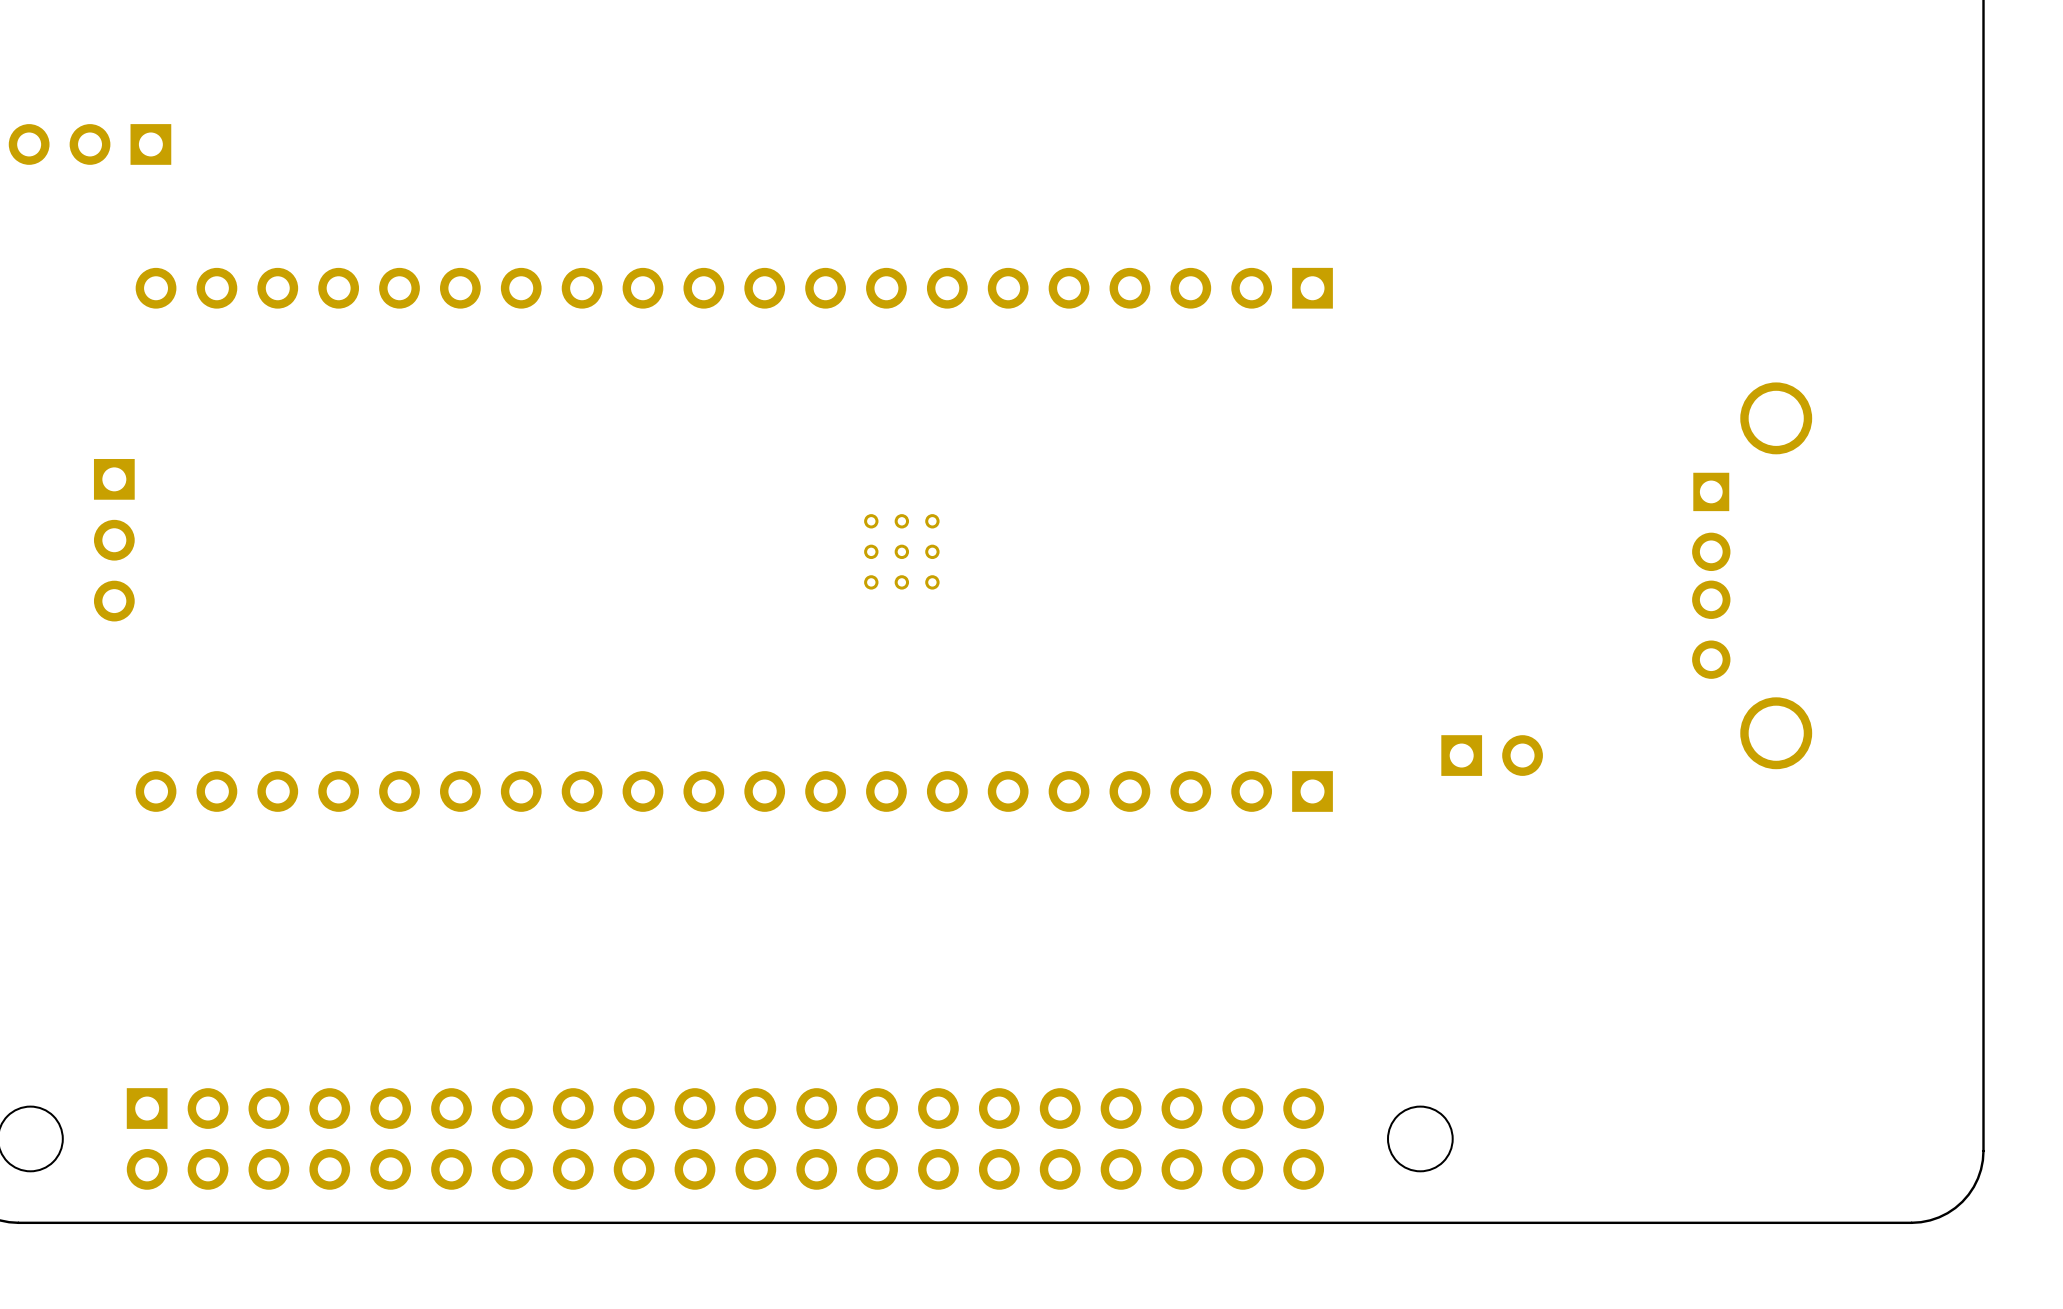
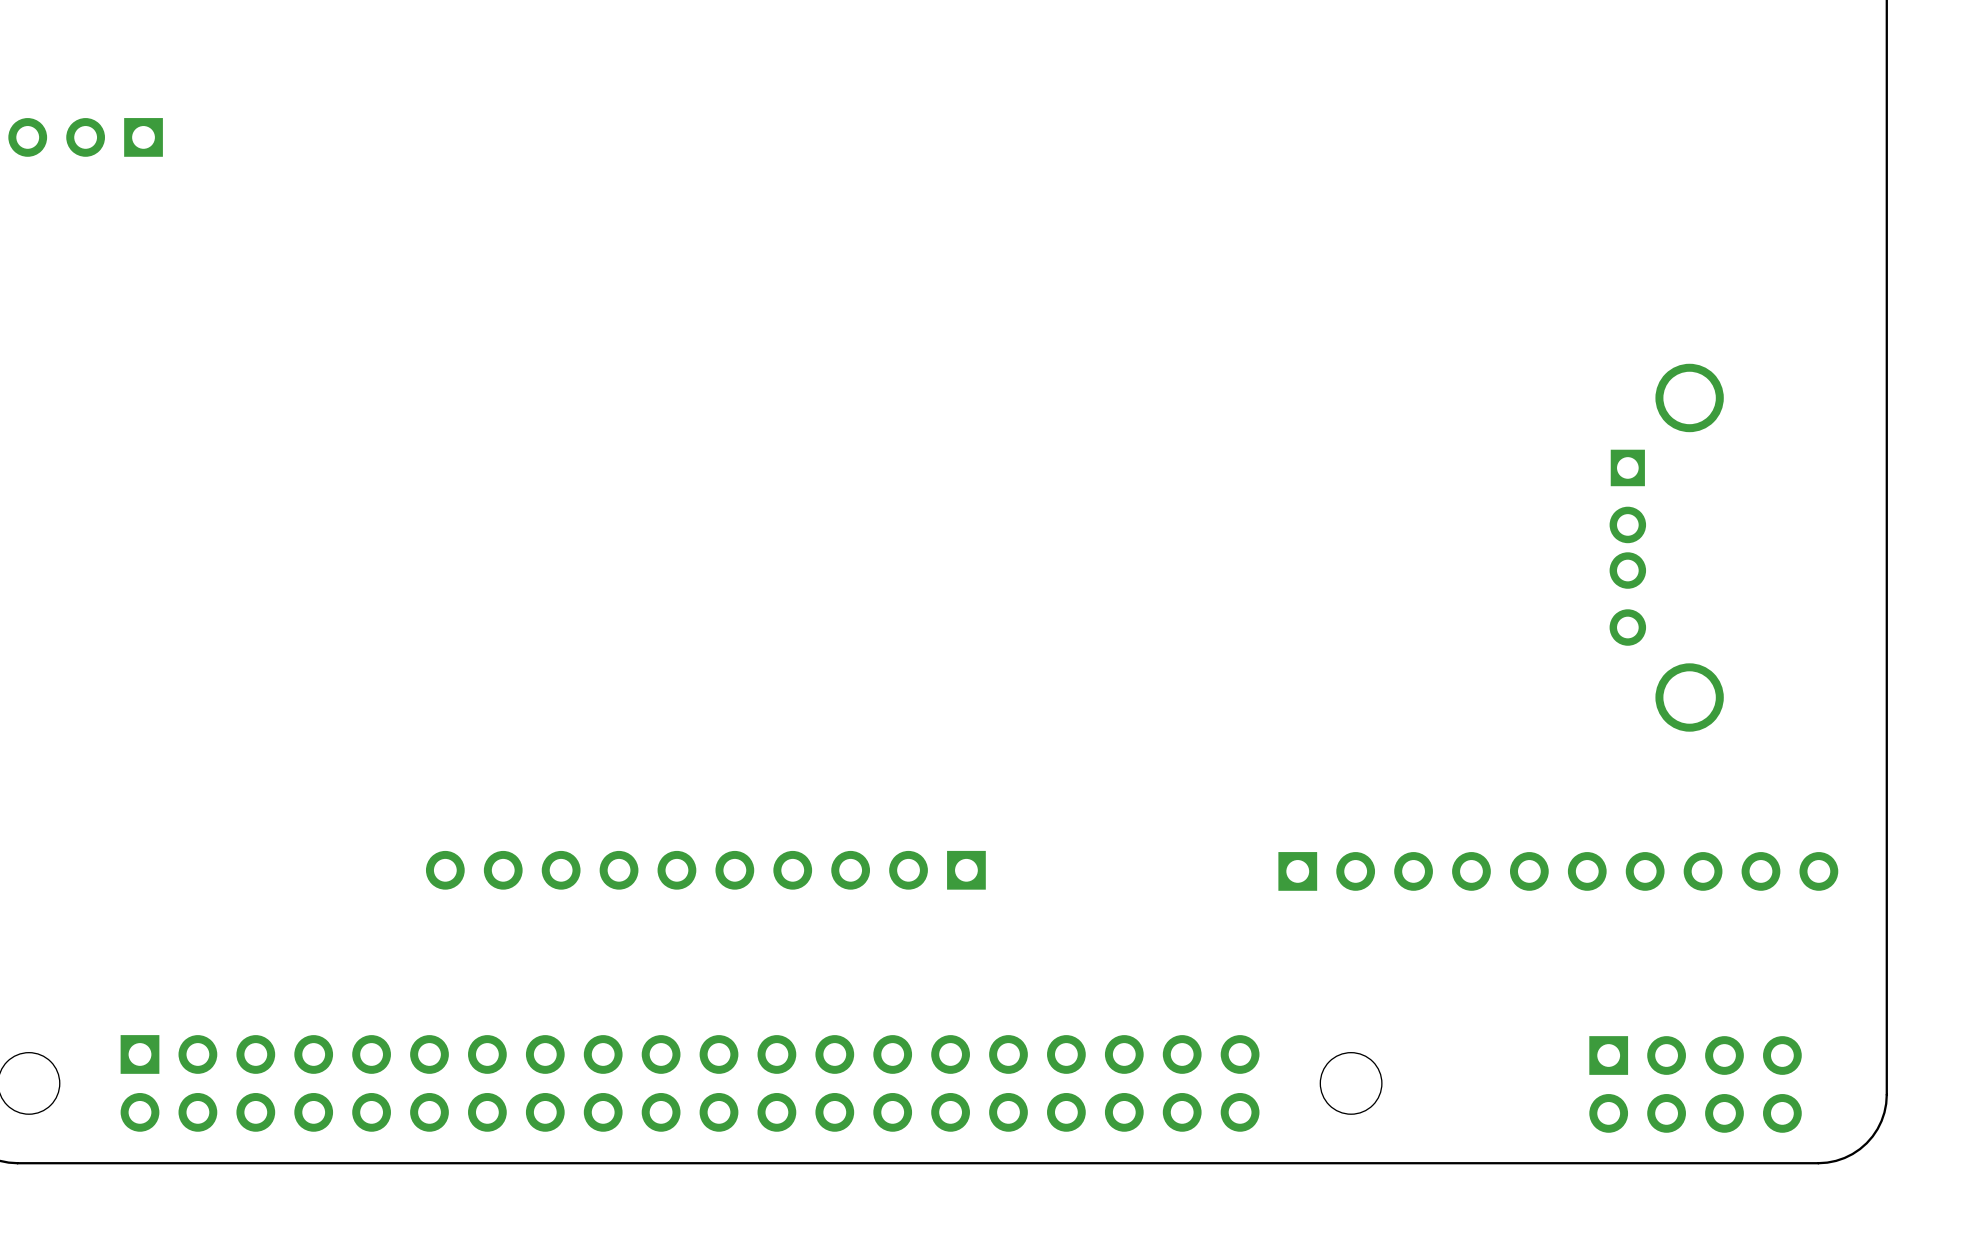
part: (734, 288) -> none
part: (114, 540) -> none
part: (901, 551) -> none
part: (1492, 755) -> none
part: (734, 791) -> none
part: none -> (705, 870)
part: none -> (1558, 871)
part: none -> (1695, 1084)

